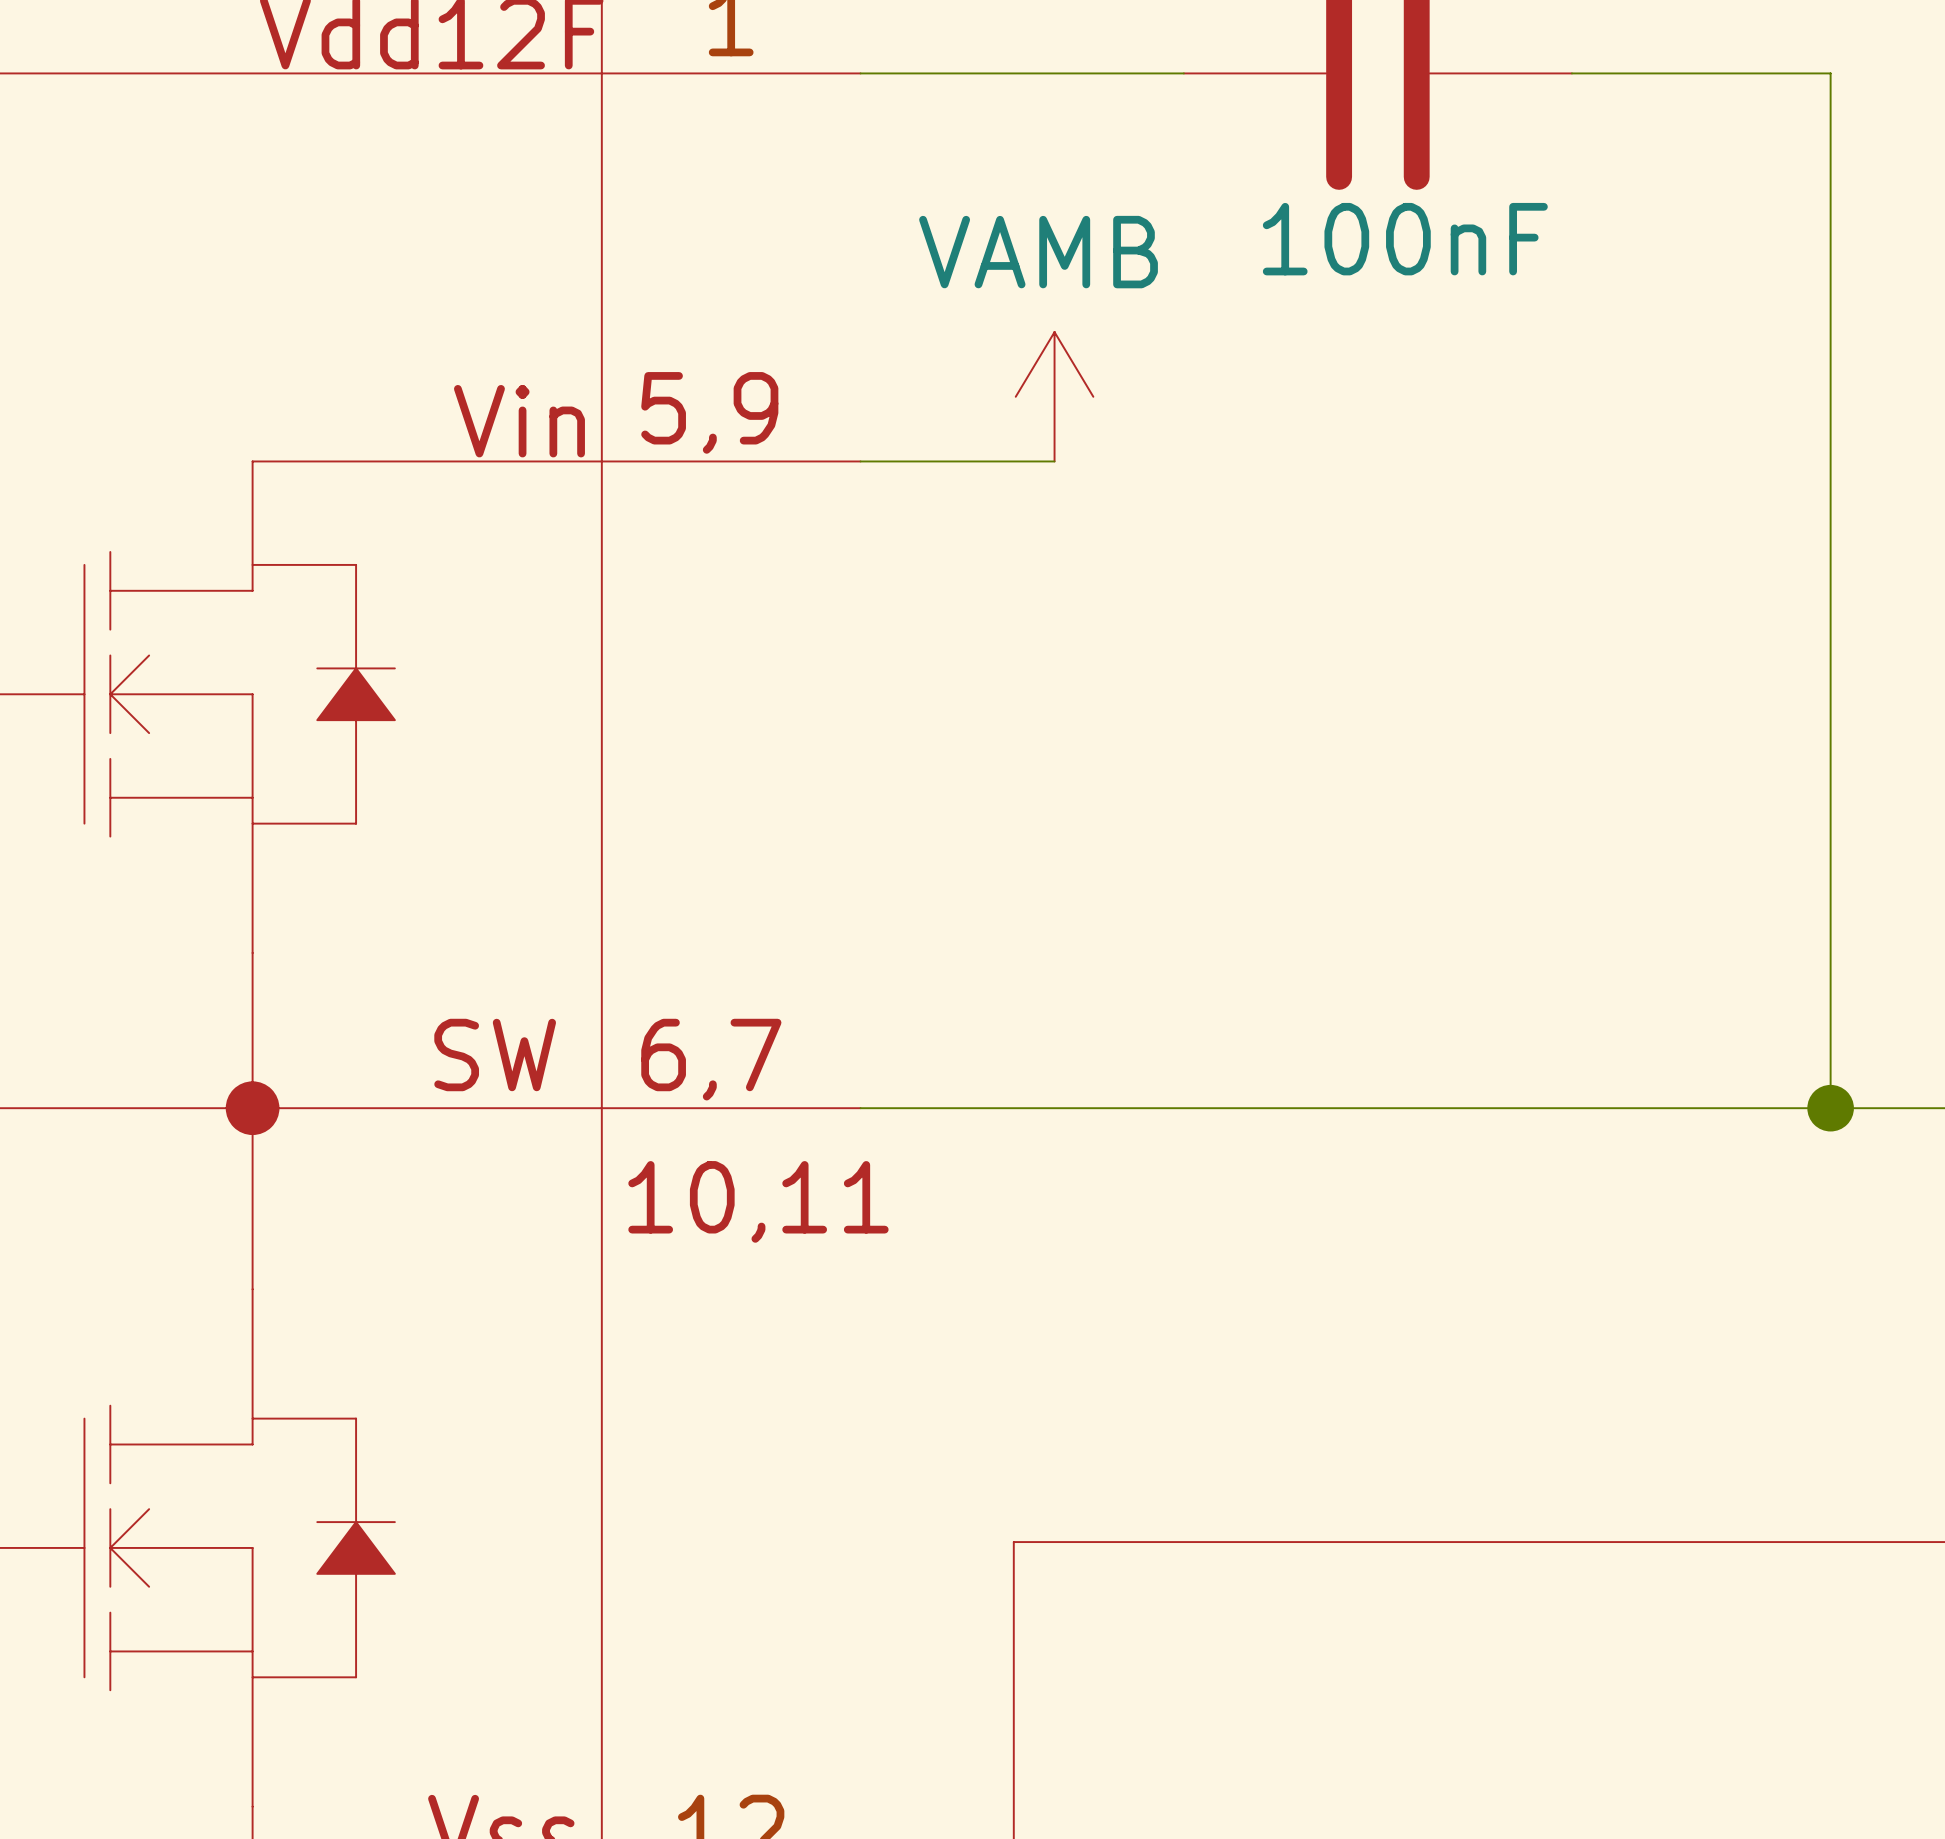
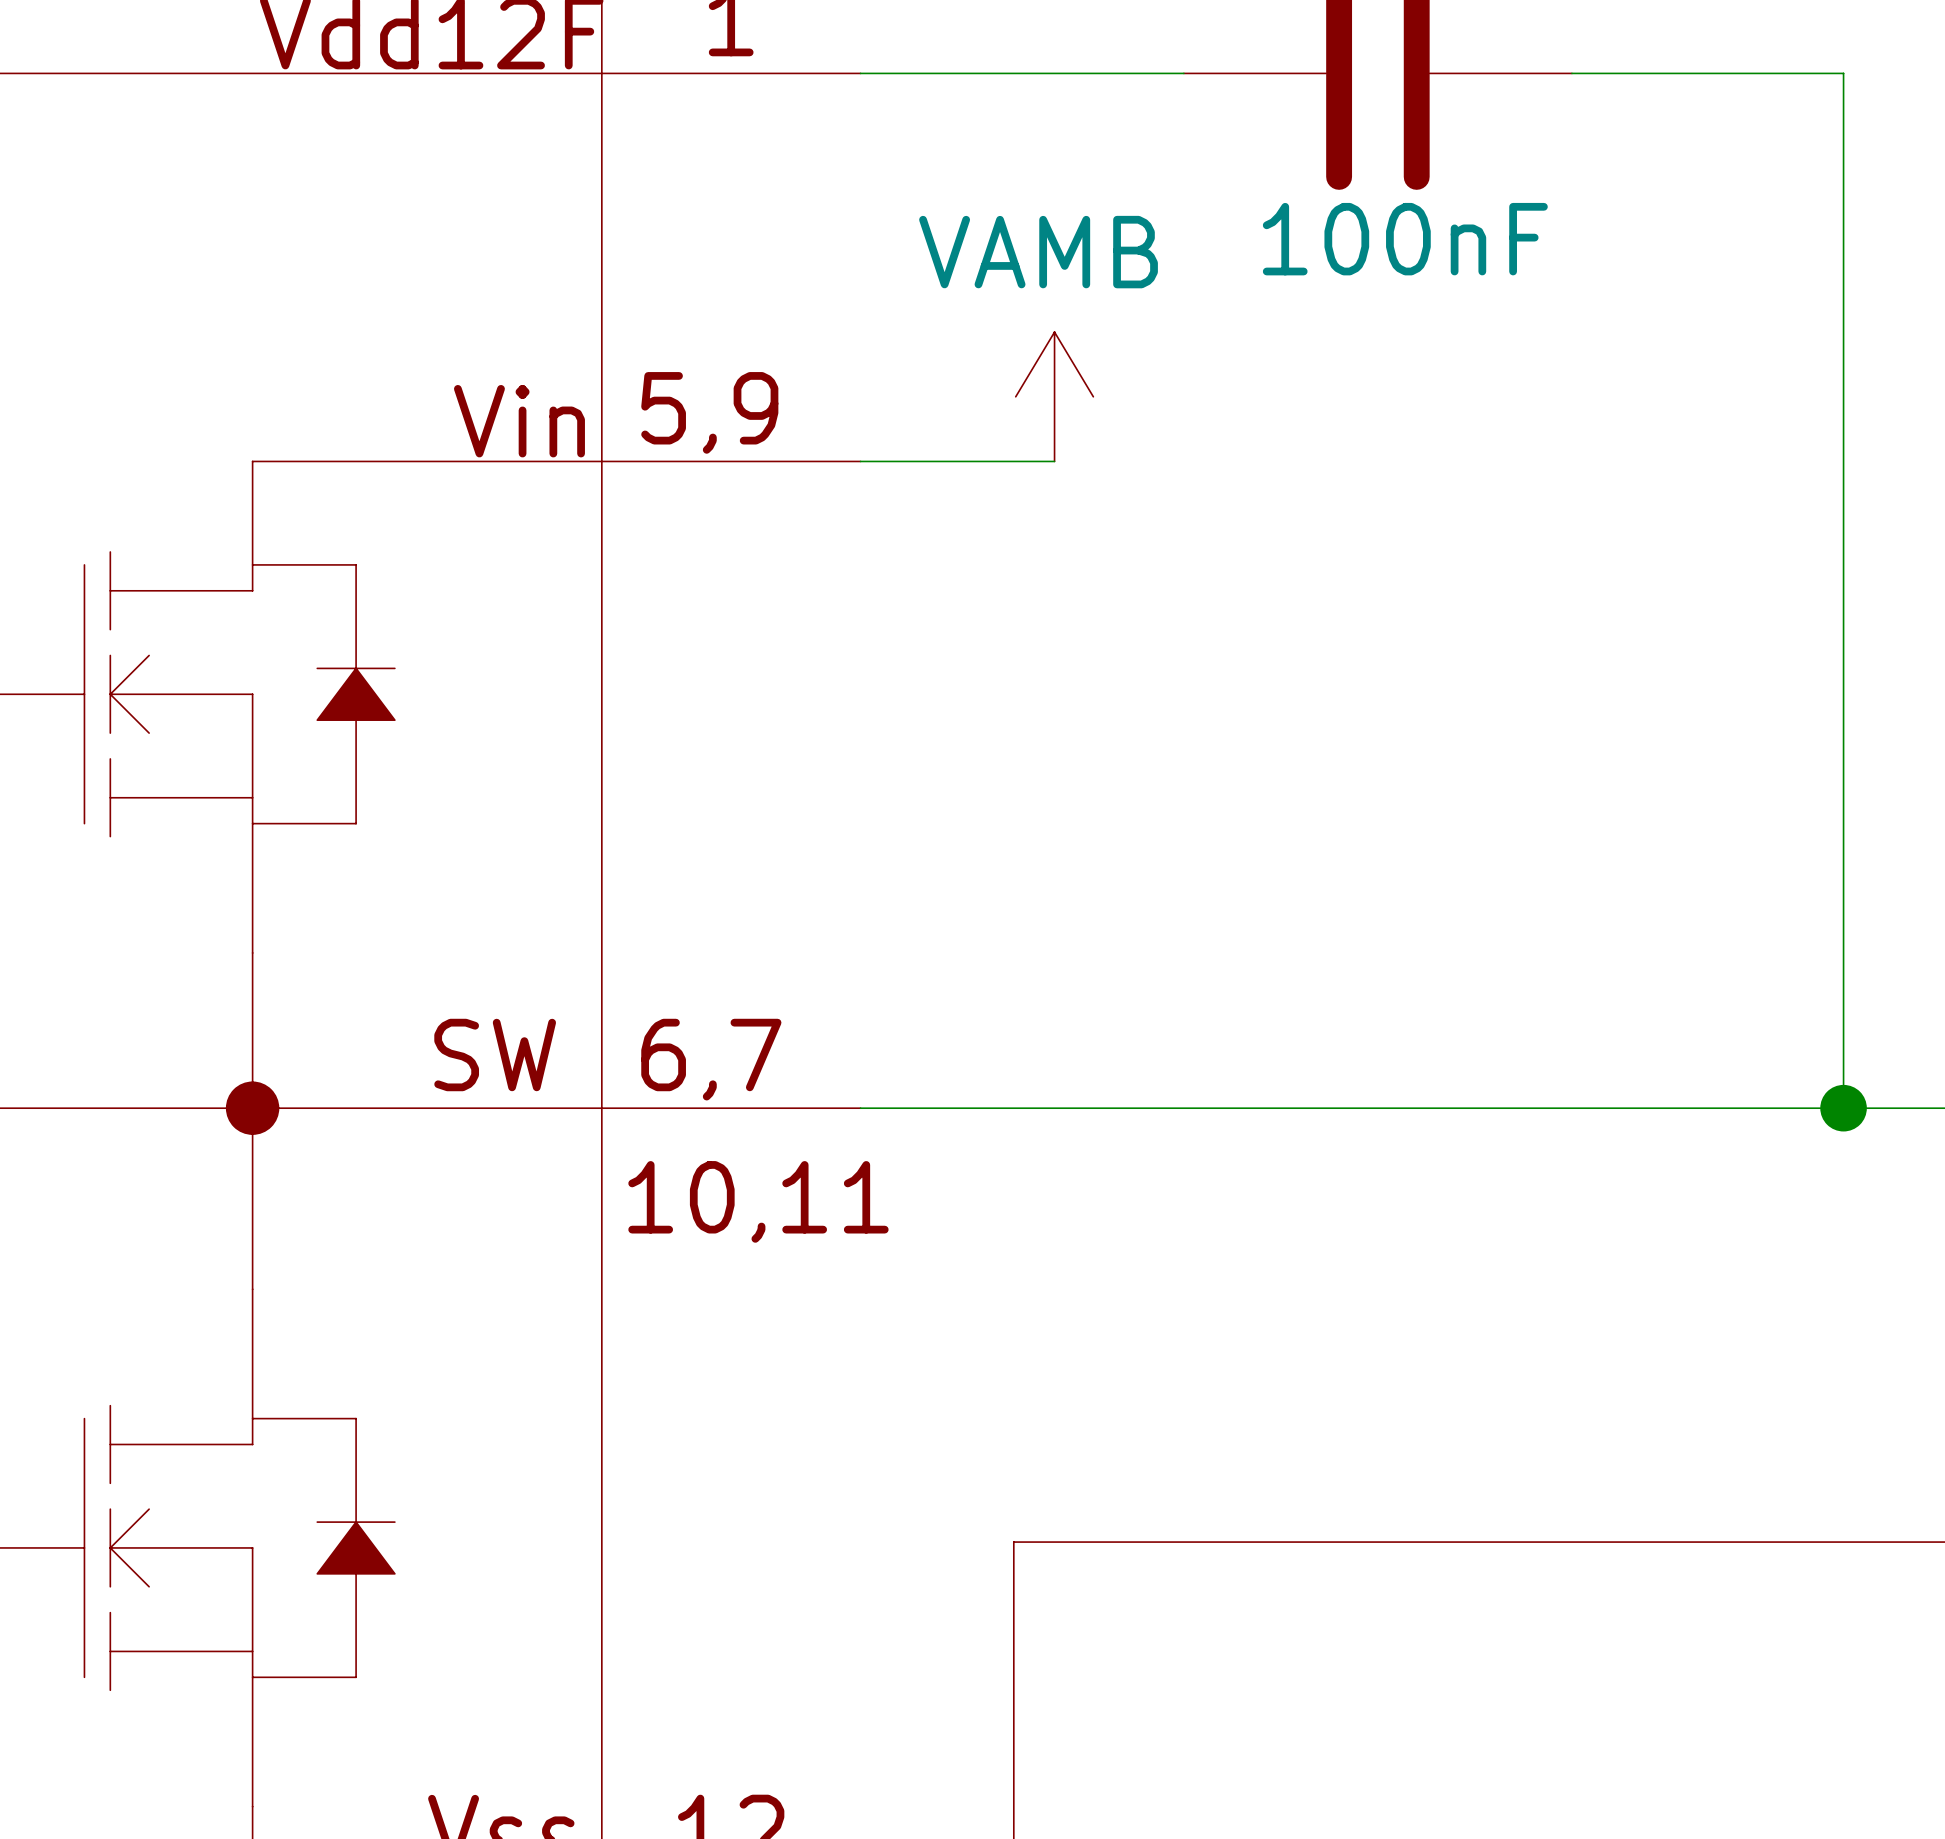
wire: (1830, 73) (1830, 1108) -> (1830, 73) (1843, 73) (1843, 1108)
junction position: (1830, 1108) -> (1843, 1108)

